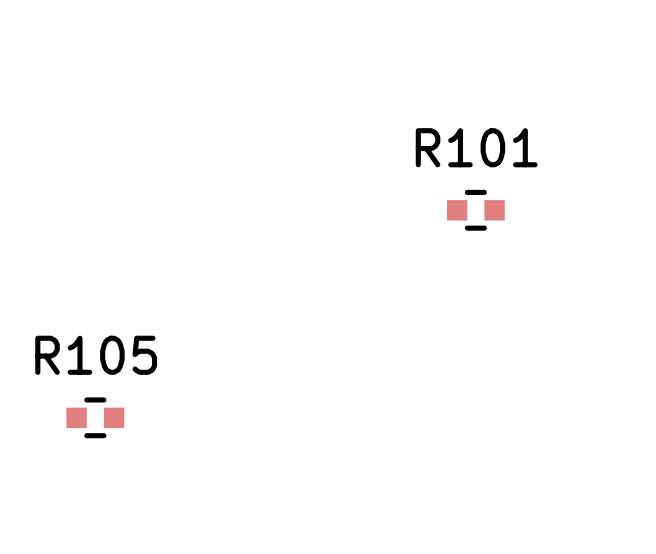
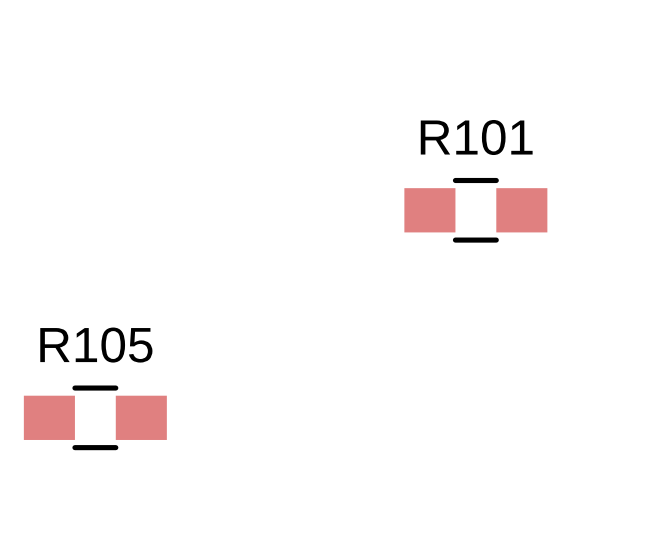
R101 footprint: [446, 189, 505, 231] -> [404, 177, 548, 243]
R105 footprint: [66, 397, 125, 439] -> [23, 385, 167, 451]

